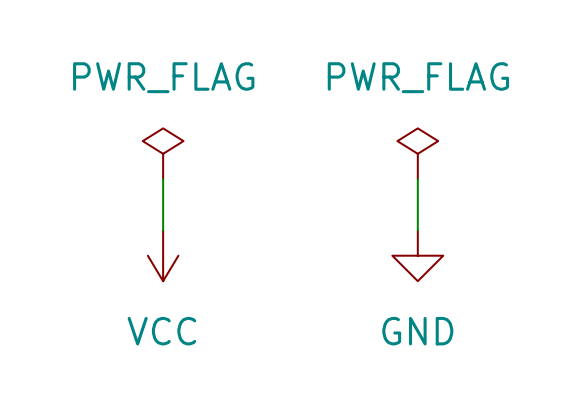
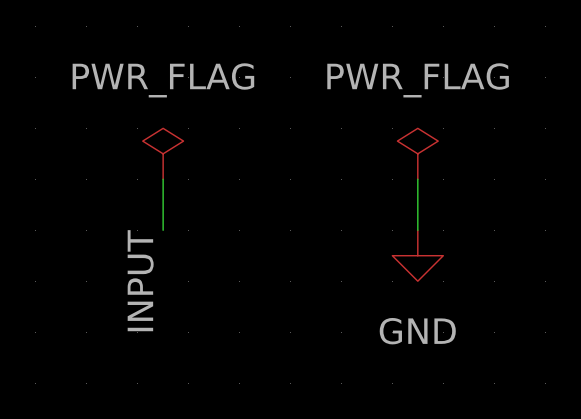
power symbol: VCC (163, 255) -> none
label: none -> INPUT (140, 280)

